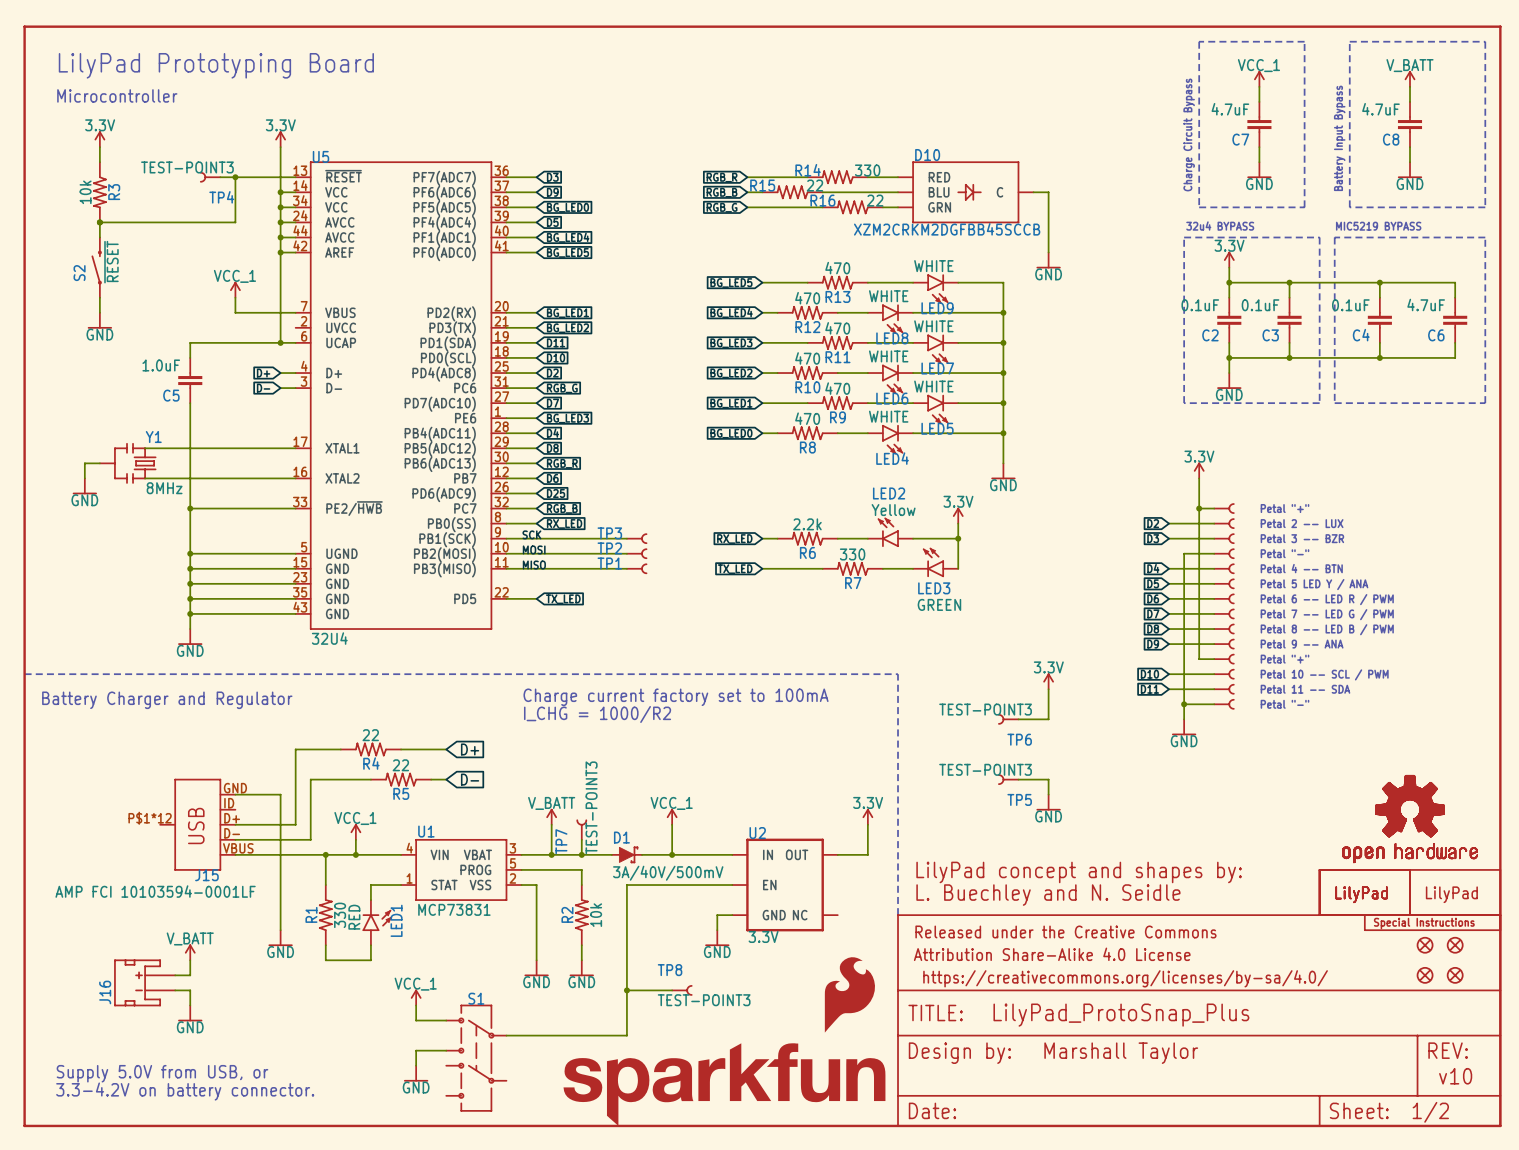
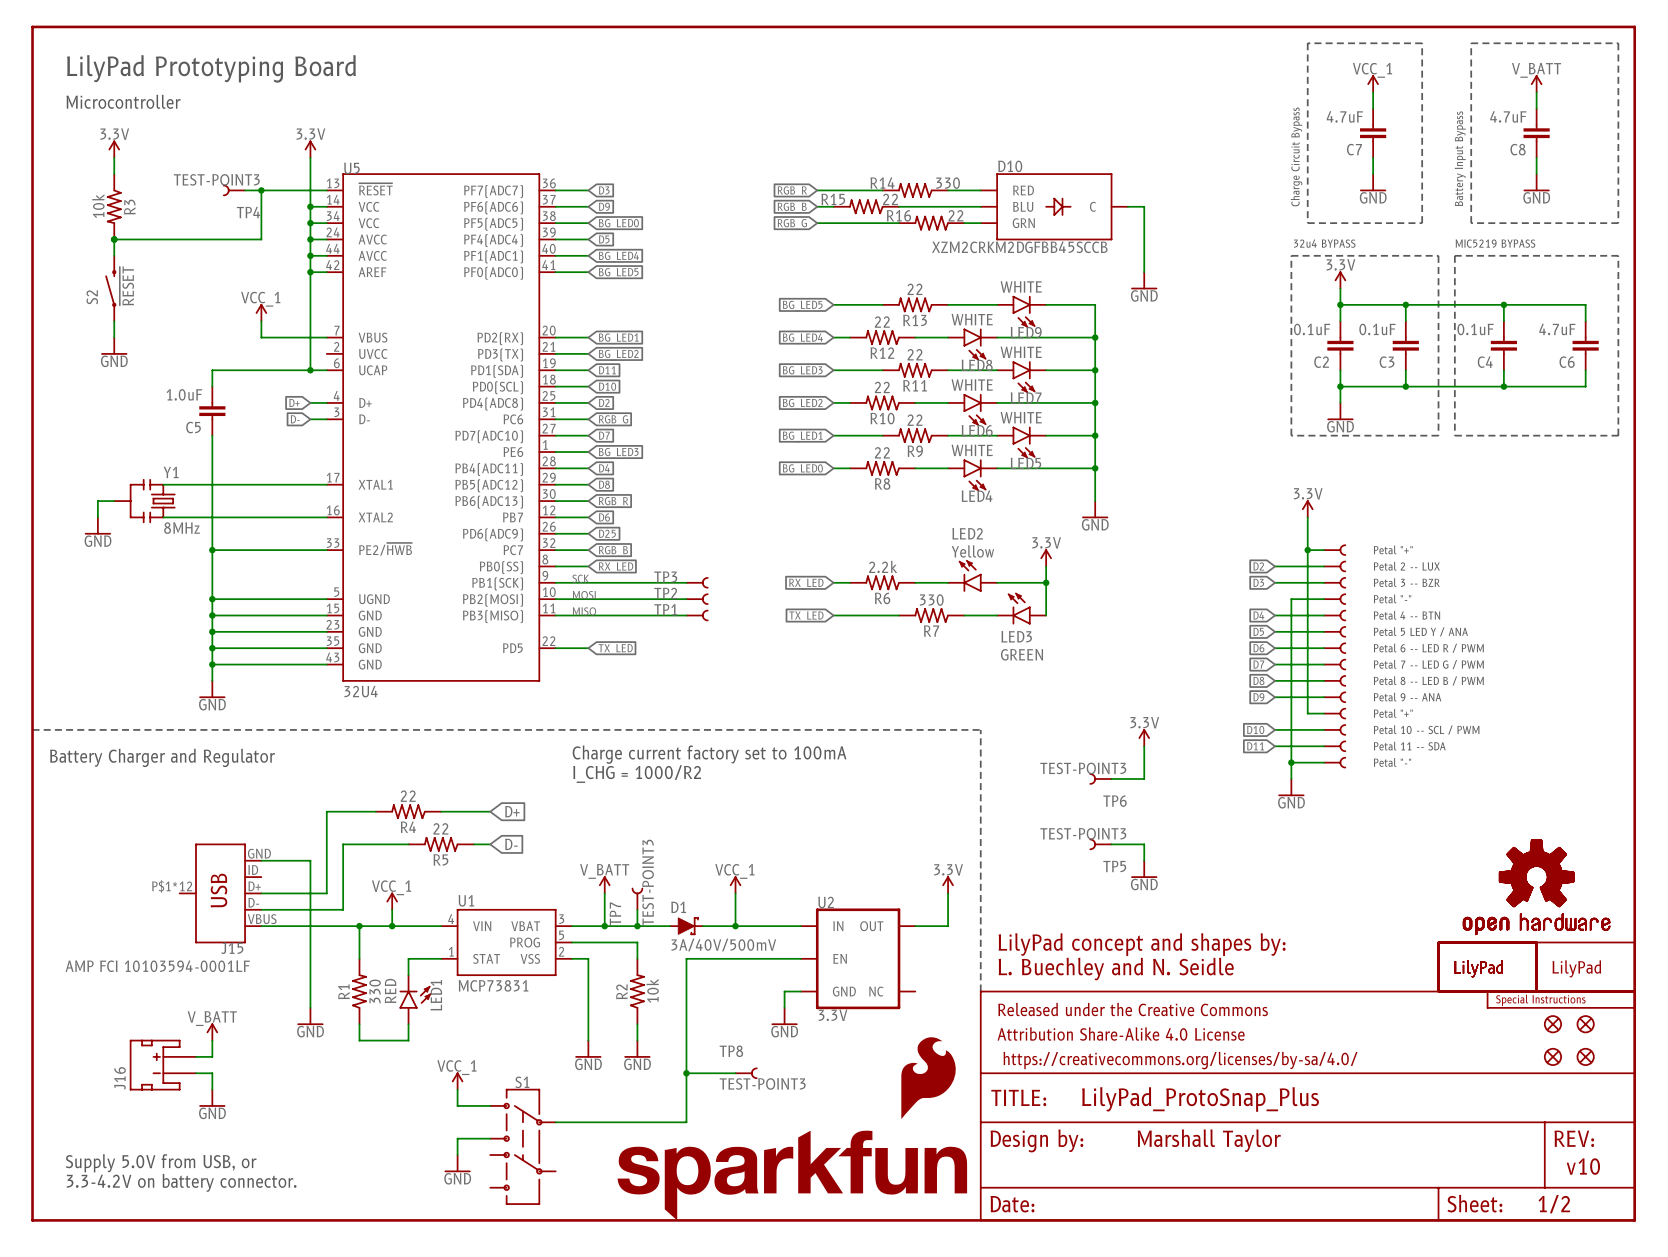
R13 value: 470 (837, 268) -> 22 (915, 289)
R12 value: 470 (807, 298) -> 22 (882, 322)
R11 value: 470 (837, 328) -> 22 (915, 354)
R10 value: 470 (807, 358) -> 22 (882, 387)
R9 value: 470 (837, 388) -> 22 (915, 420)
R8 value: 470 (807, 418) -> 22 (882, 452)

